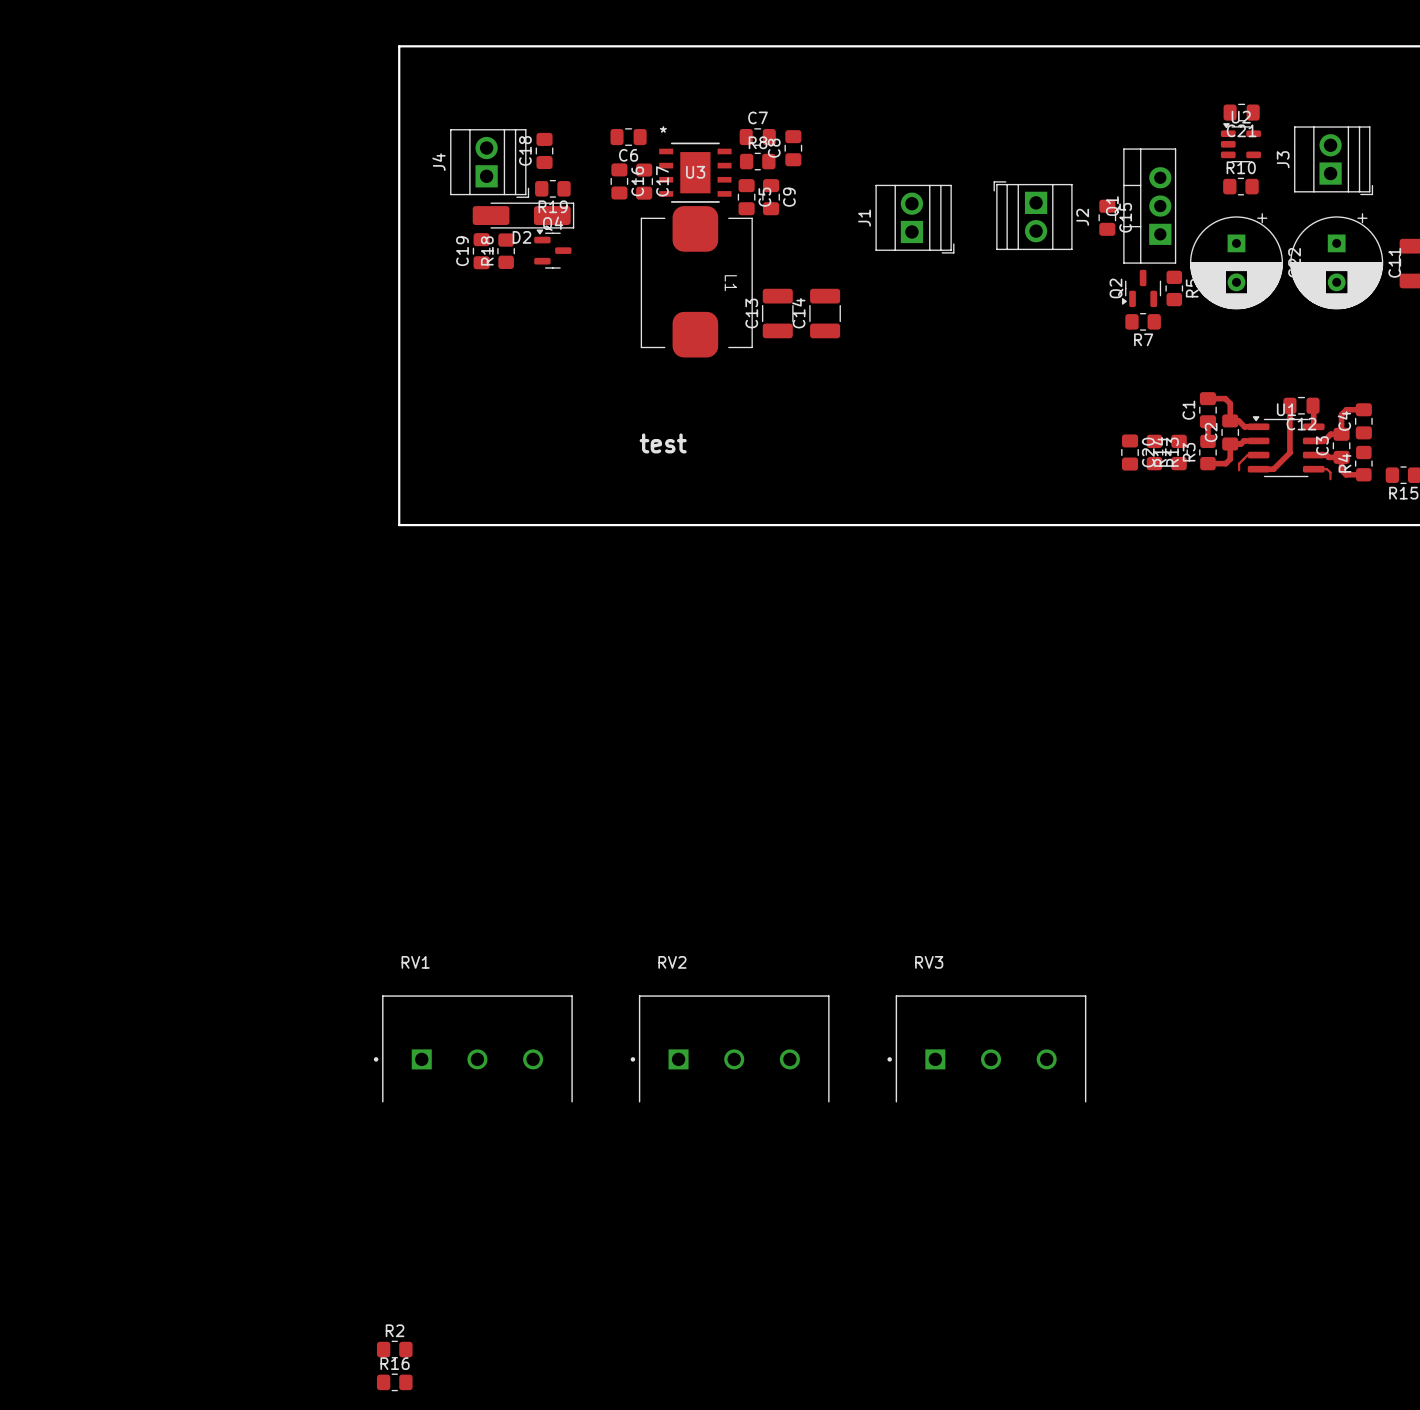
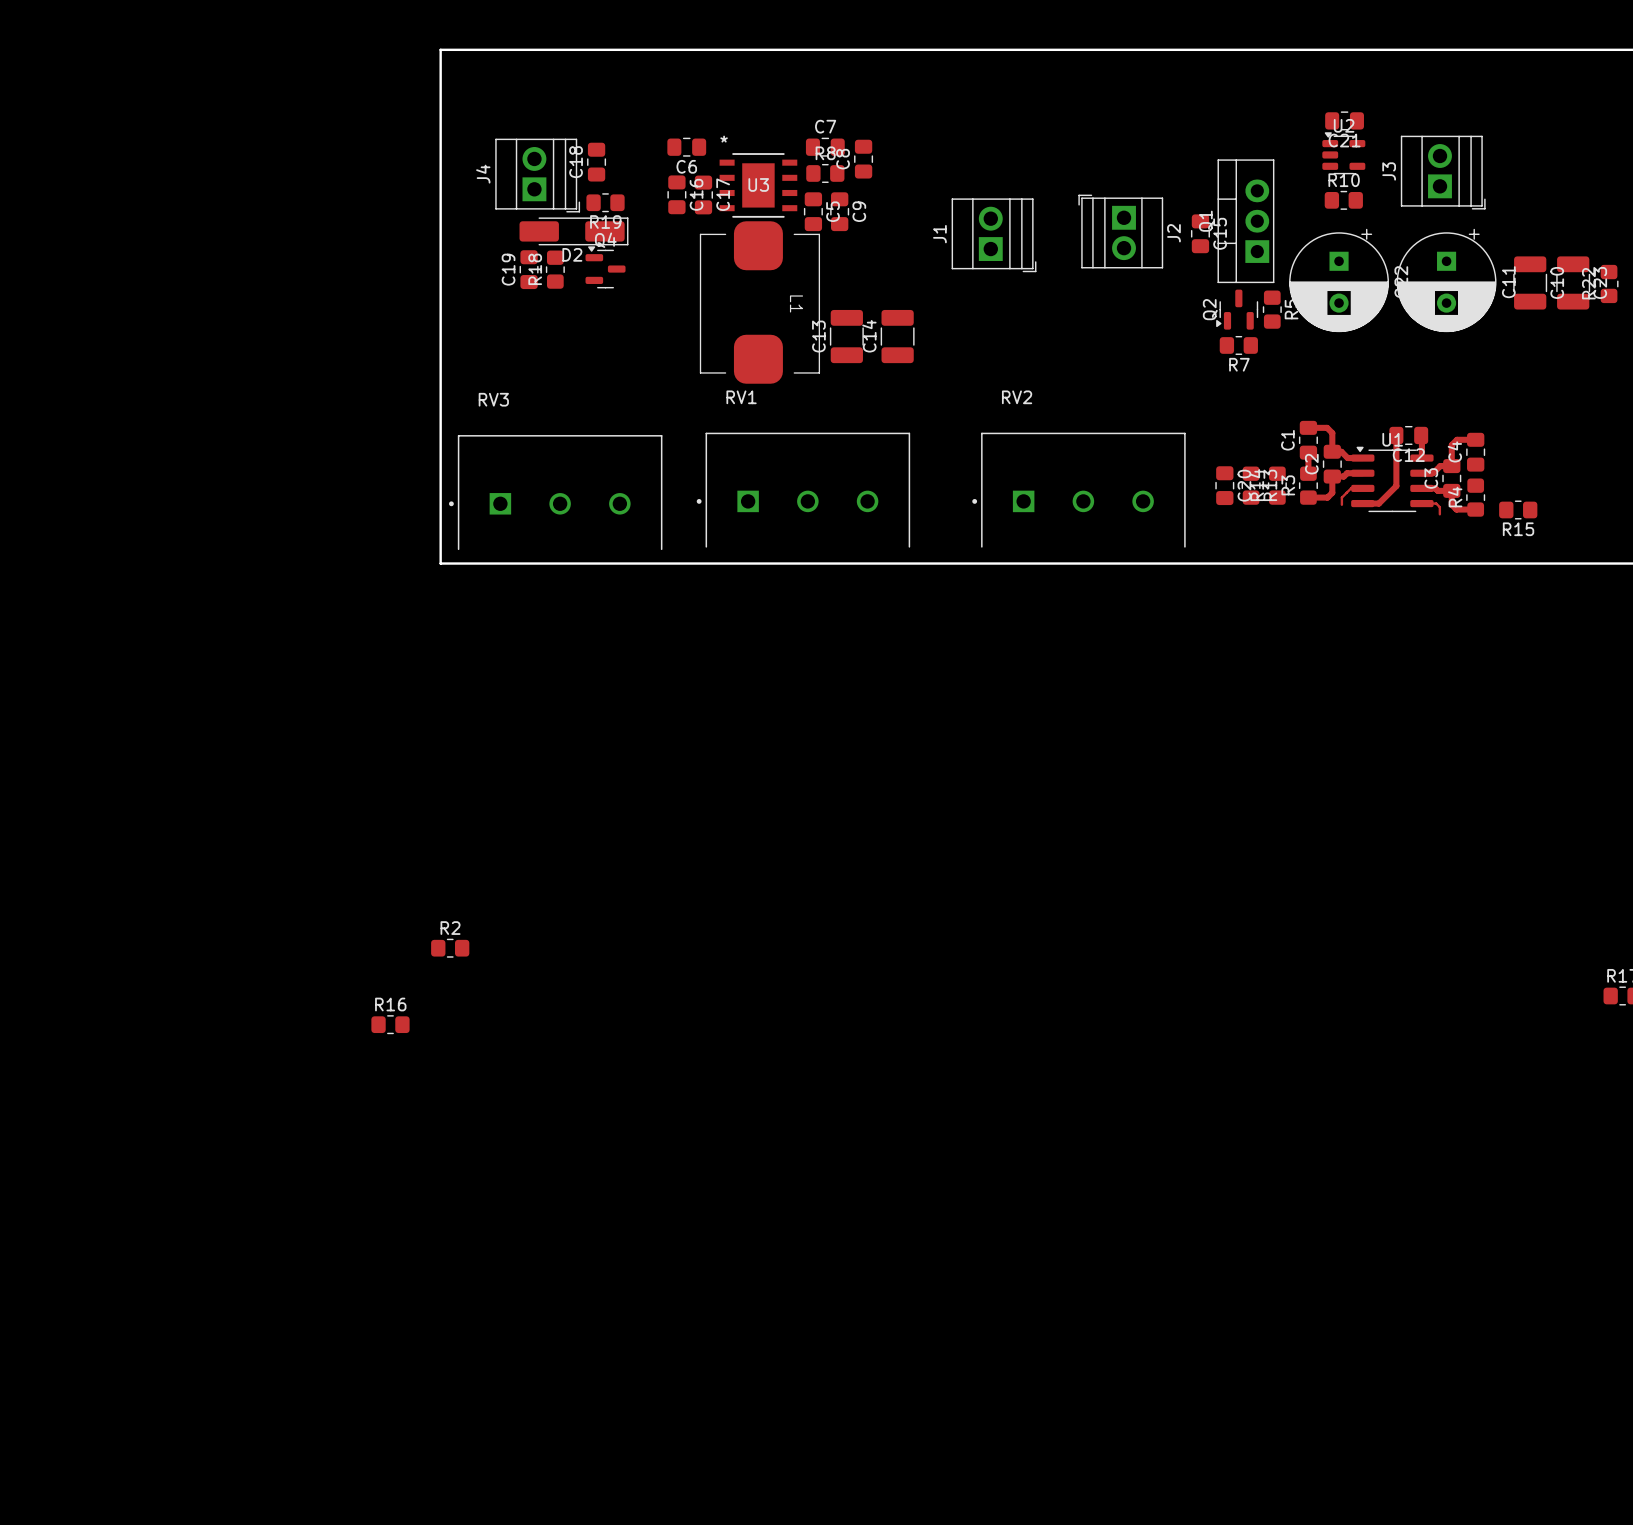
text: test (663, 443) -> none
RV1 position: (473, 1048) -> (803, 490)
RV2 position: (730, 1048) -> (1078, 490)
RV3 position: (986, 1048) -> (555, 492)
R2 position: (394, 1349) -> (450, 948)
R16 position: (394, 1382) -> (390, 1024)

